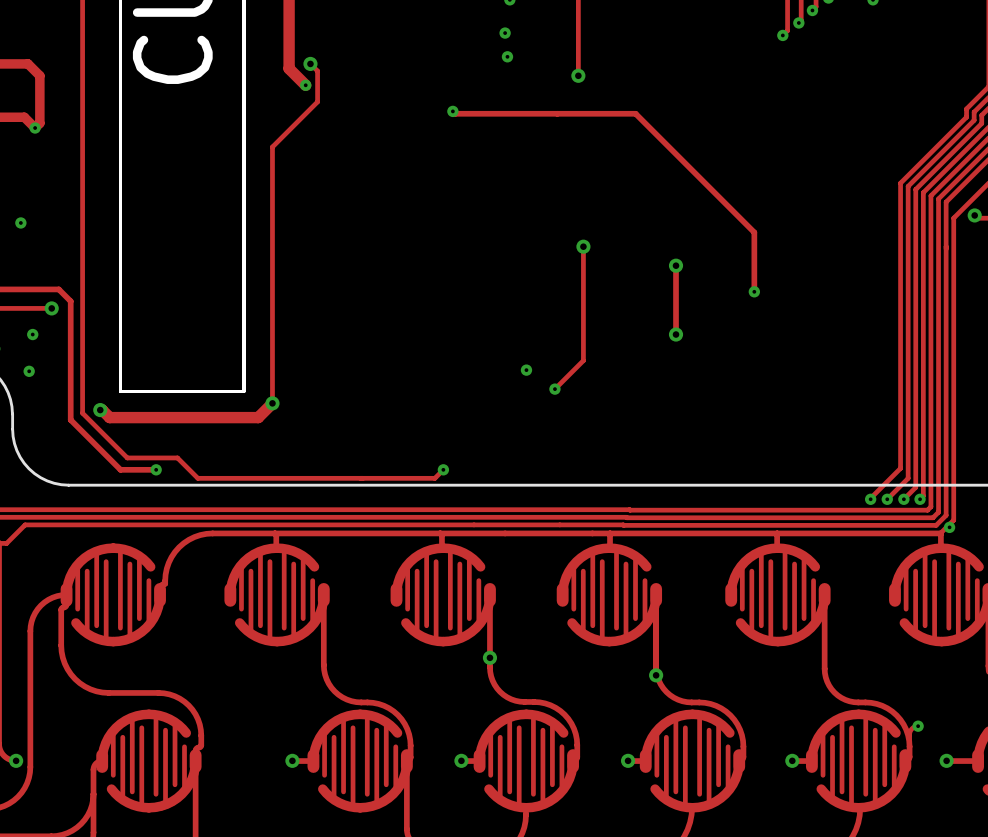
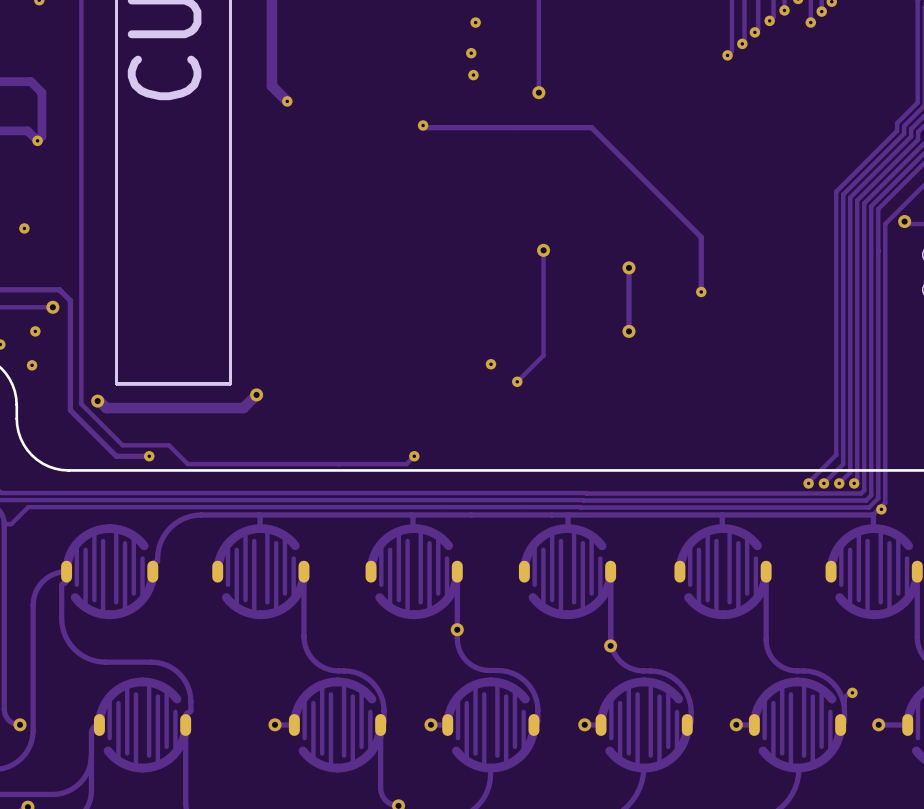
track: (310, 63) (317, 71) (317, 101) (272, 147) (272, 403) -> none
via: (310, 63) -> none

